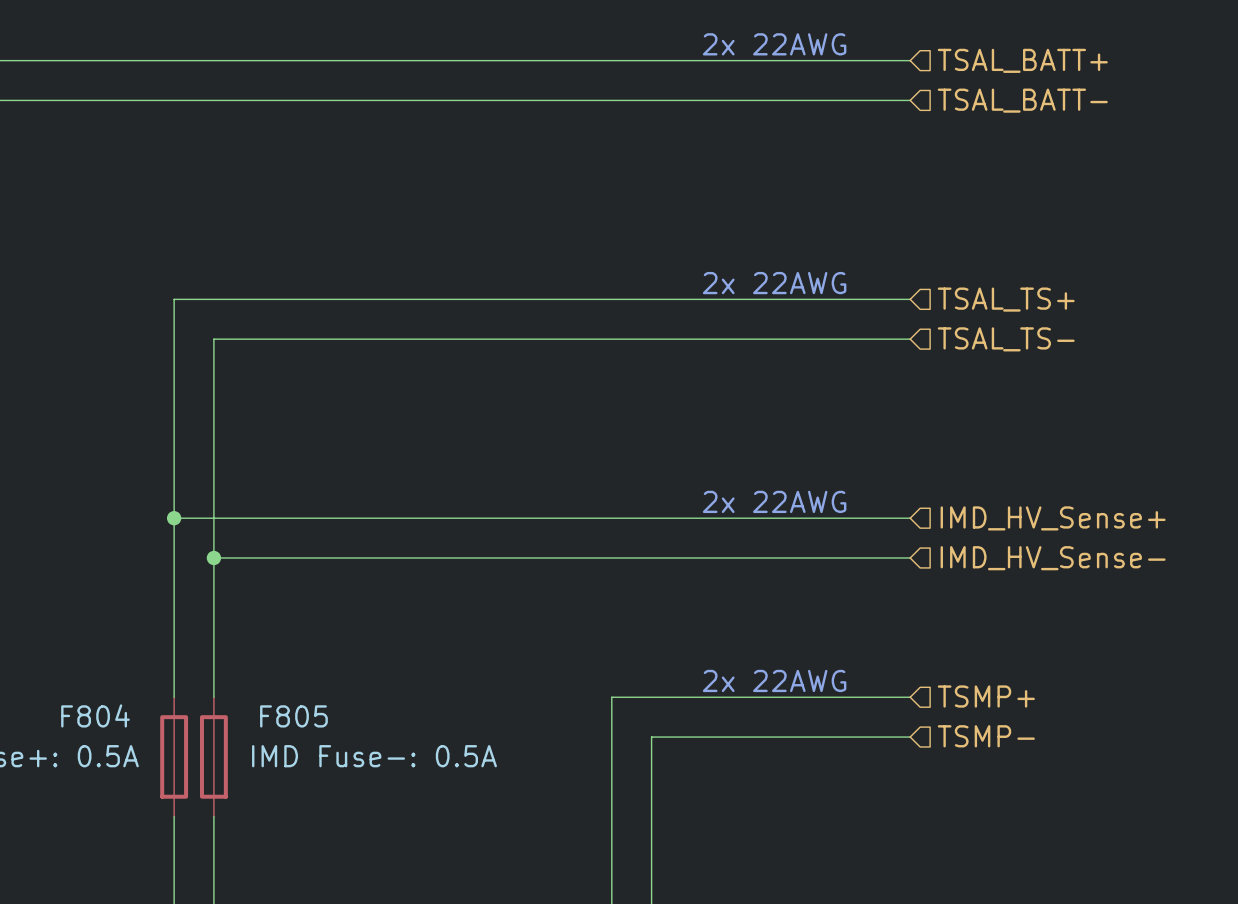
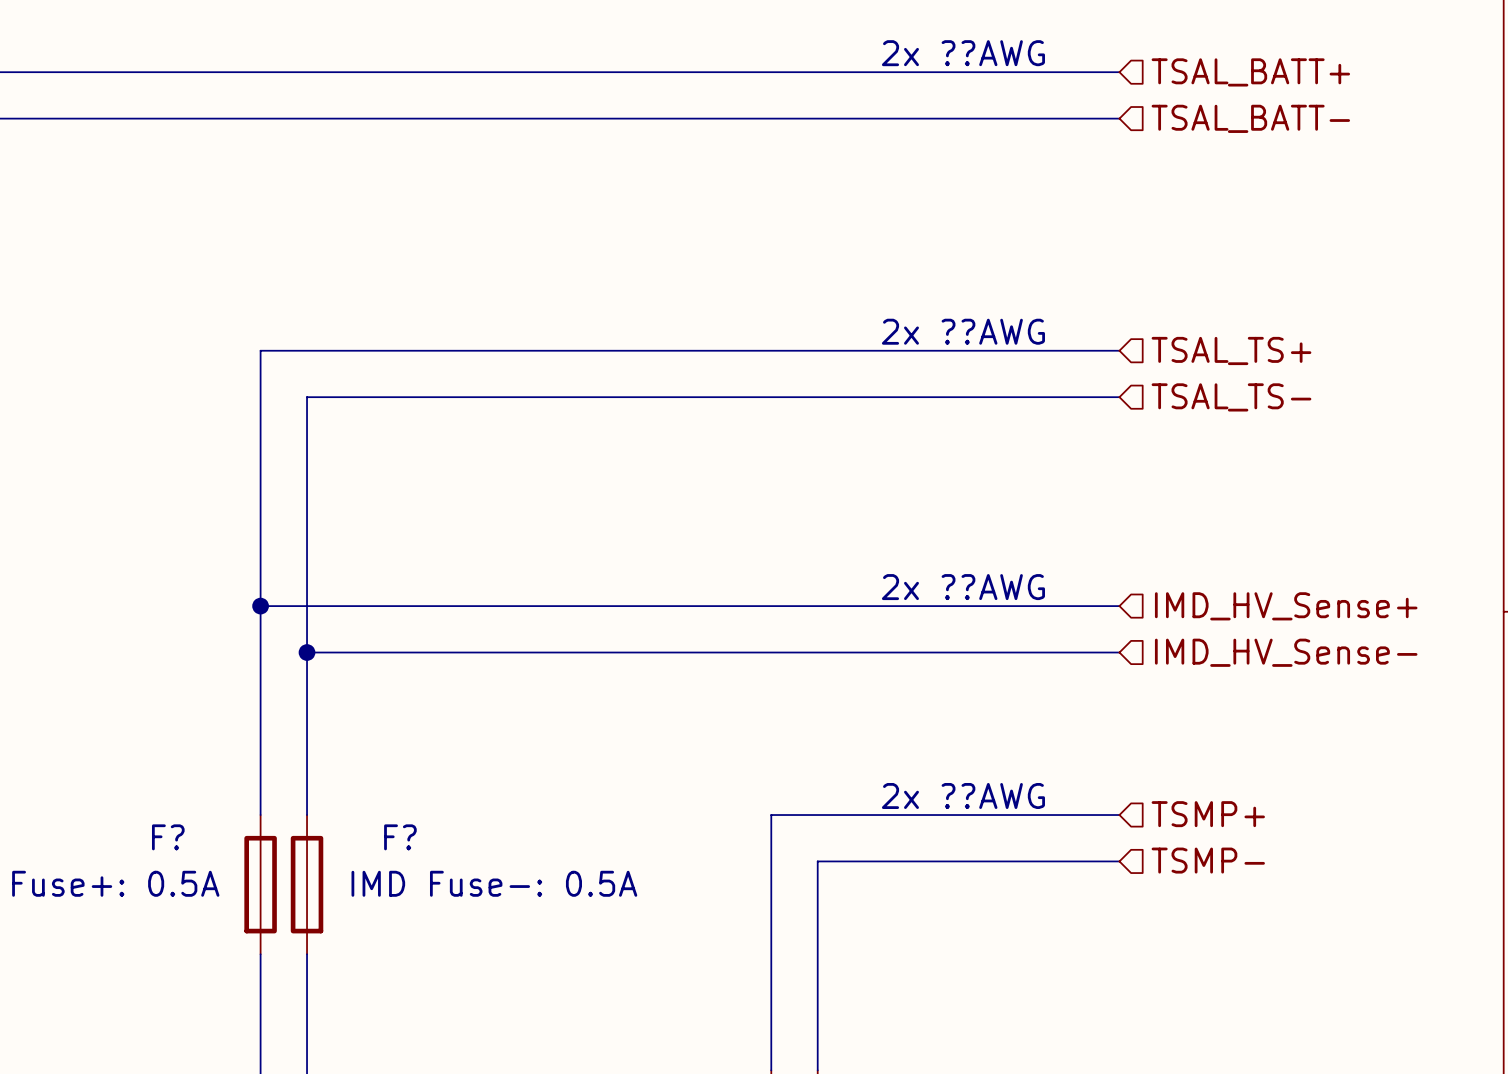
text: 2x 22AWG (774, 44) -> 2x ??AWG (963, 53)
text: 2x 22AWG (774, 283) -> 2x ??AWG (963, 331)
text: 2x 22AWG (774, 501) -> 2x ??AWG (963, 587)
text: 2x 22AWG (774, 680) -> 2x ??AWG (963, 795)
F804 name: F804 (95, 715) -> F? (168, 837)
F805 name: F805 (293, 716) -> F? (400, 837)

